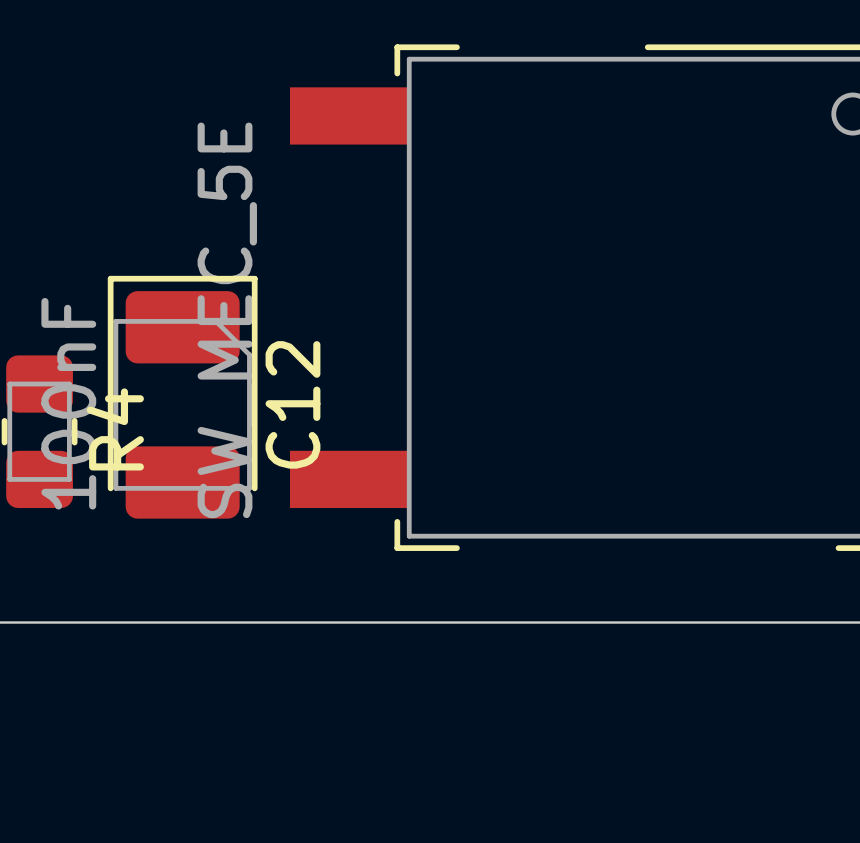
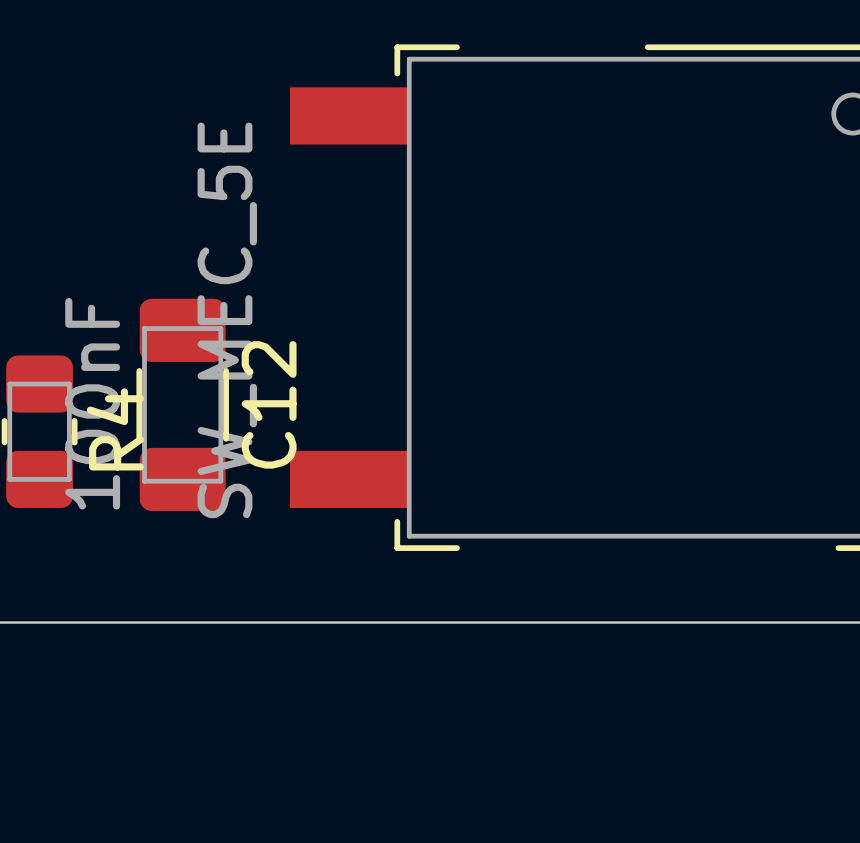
C12 footprint: [107, 275, 258, 519] -> [136, 298, 229, 512]

